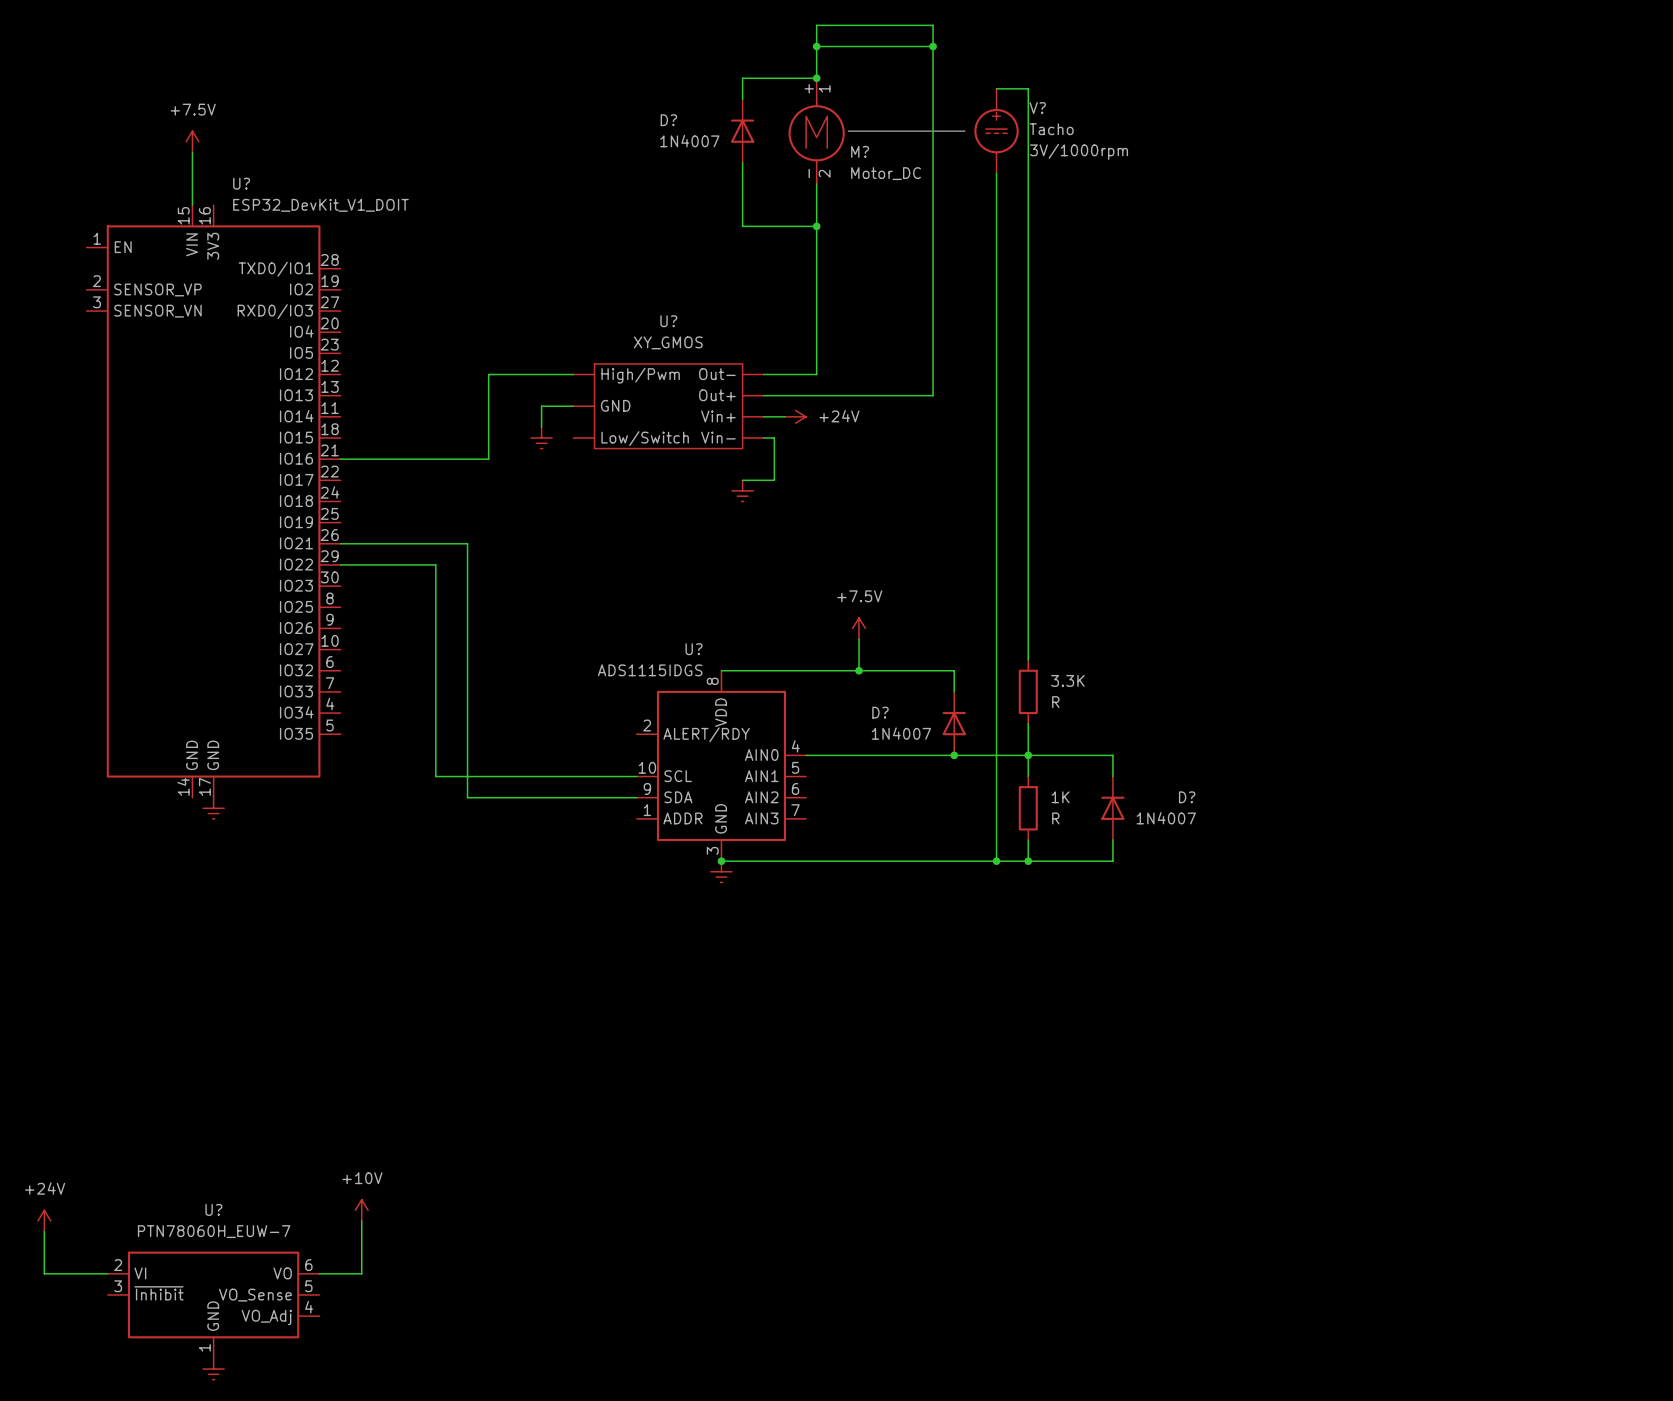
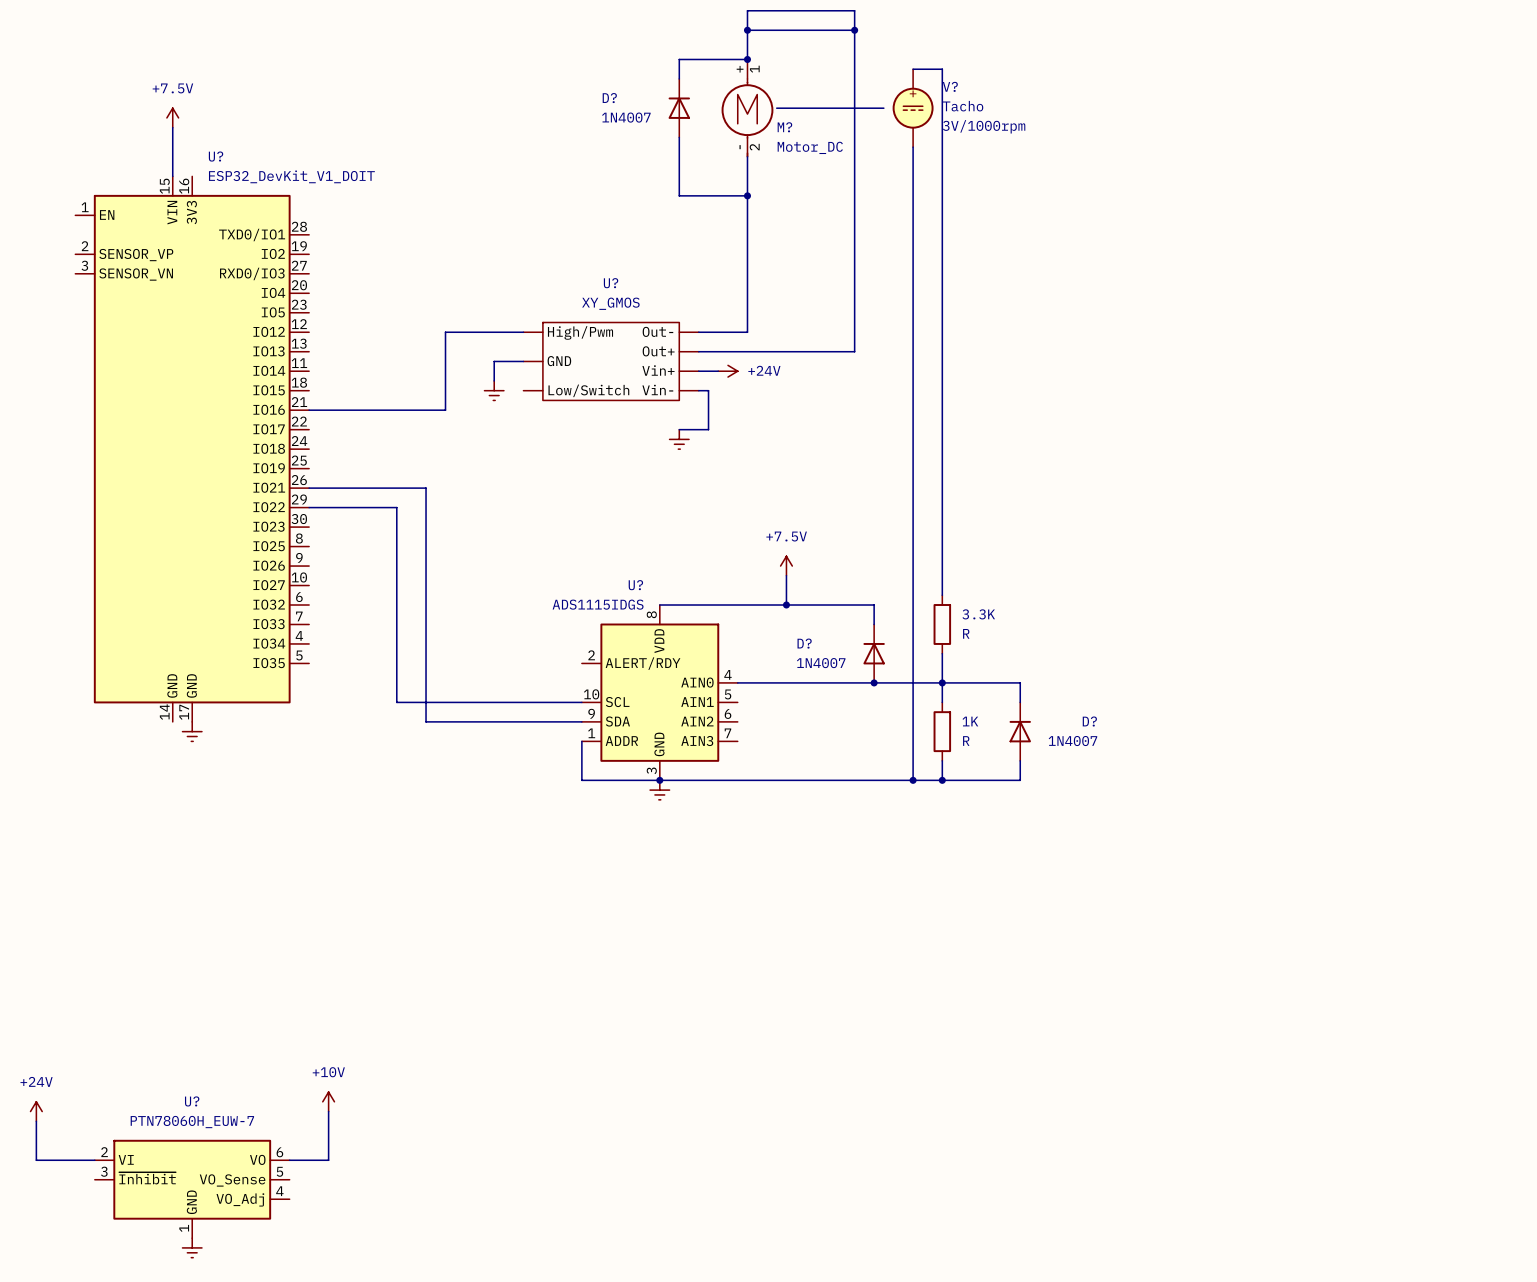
wire: none -> (581, 741) (581, 780) (659, 780)

